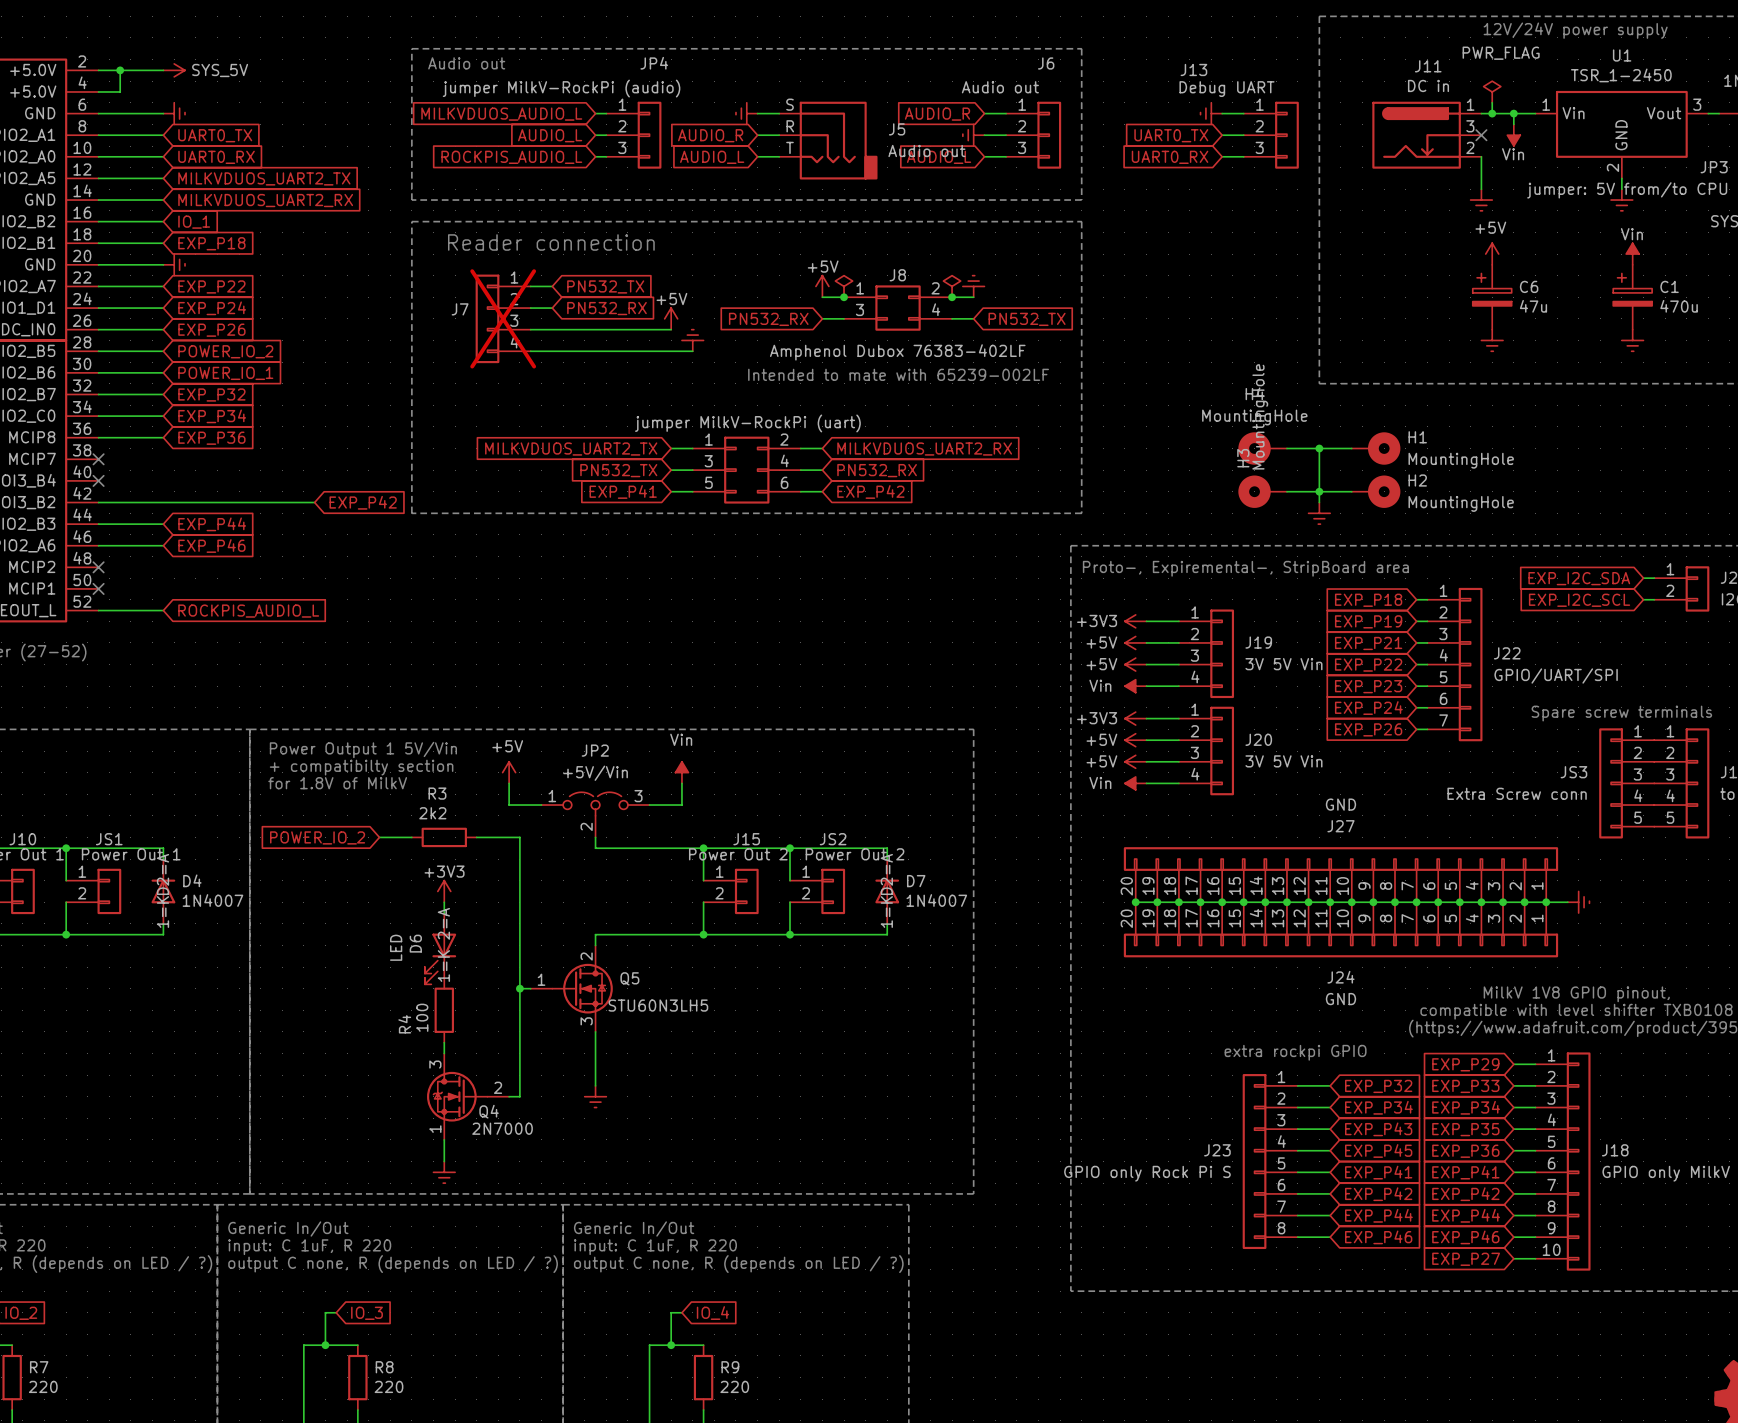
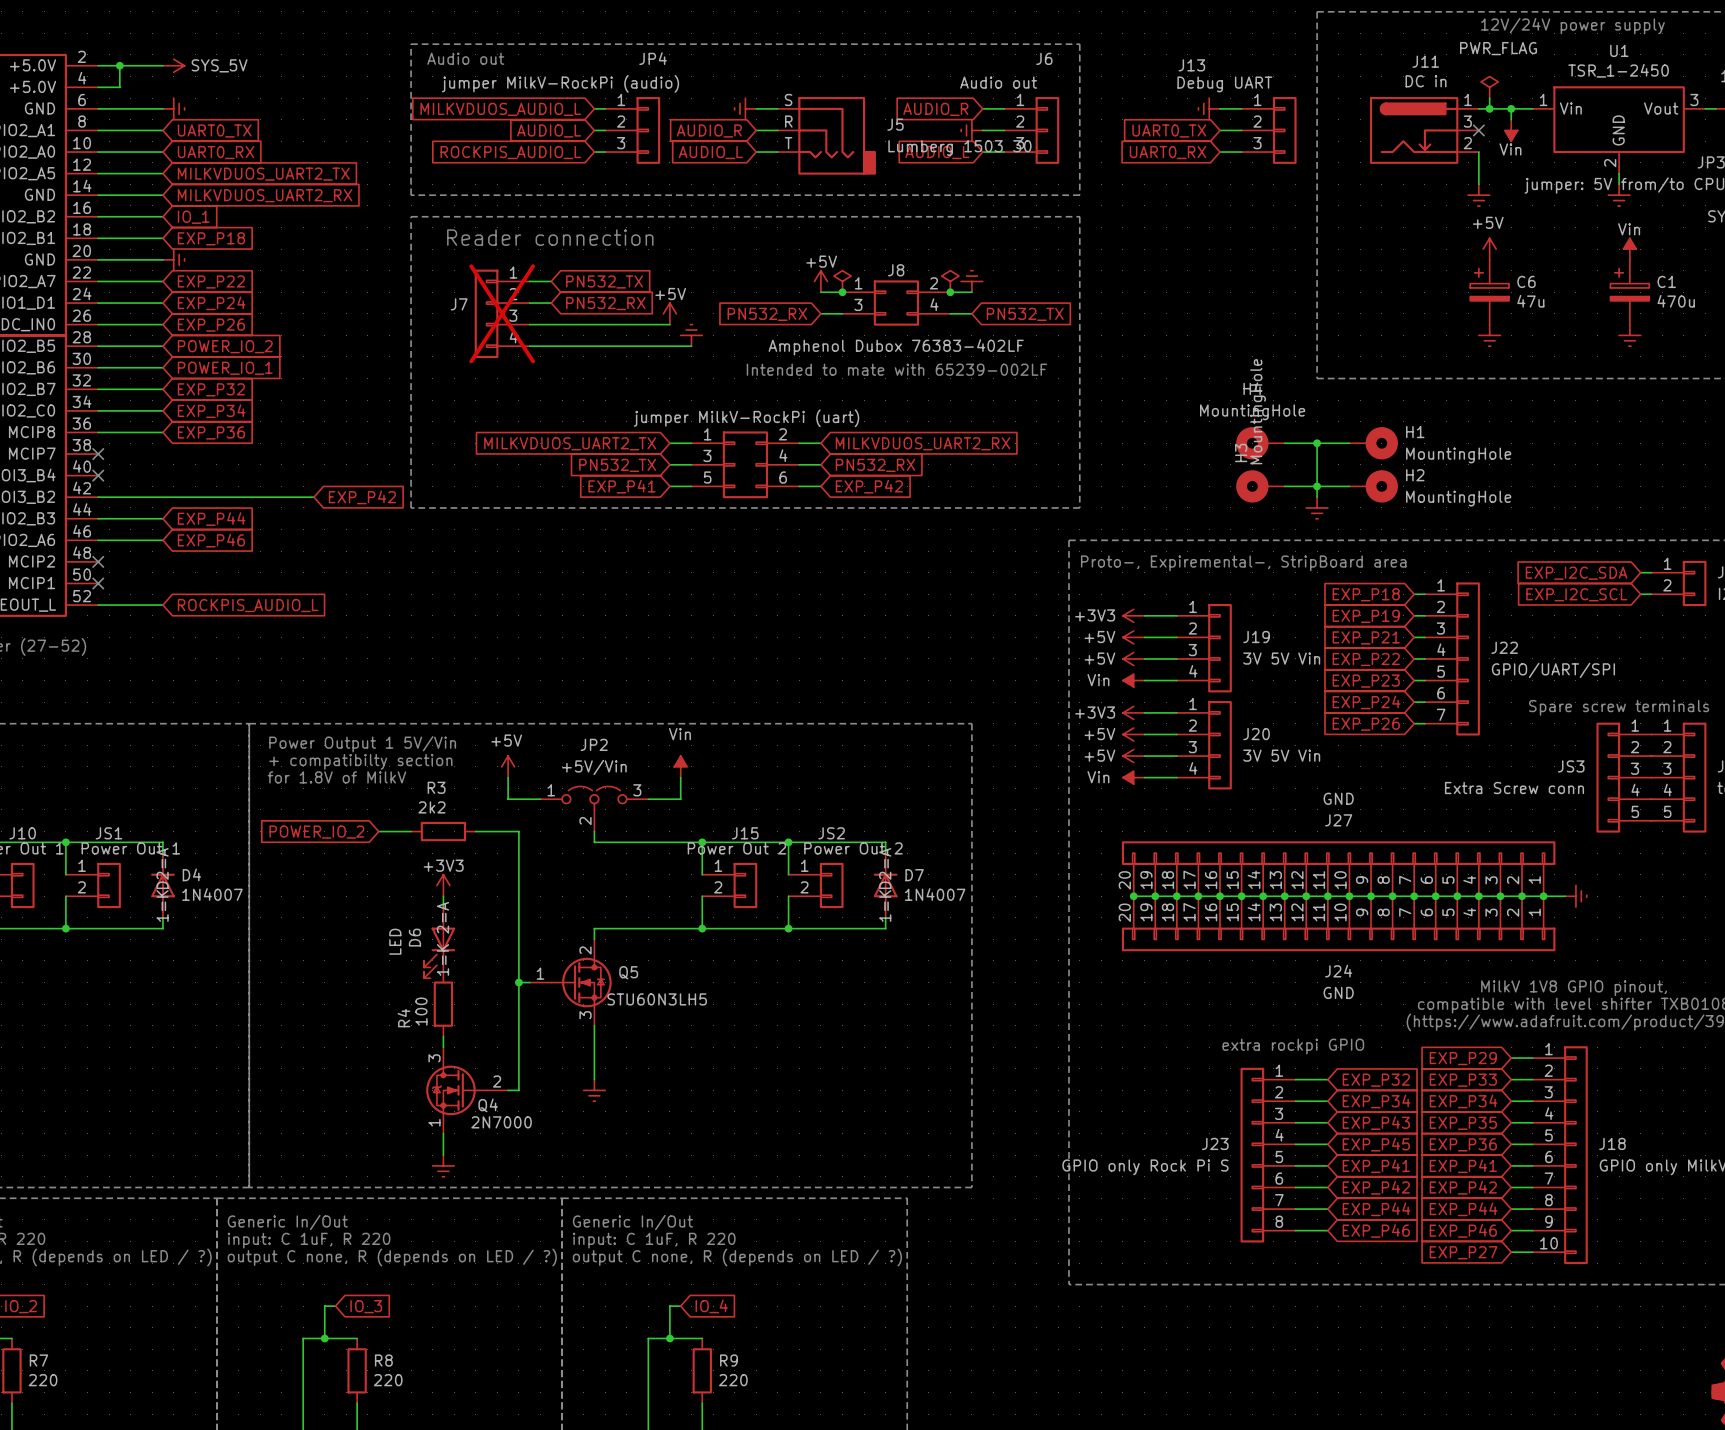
J5 value: Audio out (926, 151) -> Lumberg 1503 30 (959, 148)

